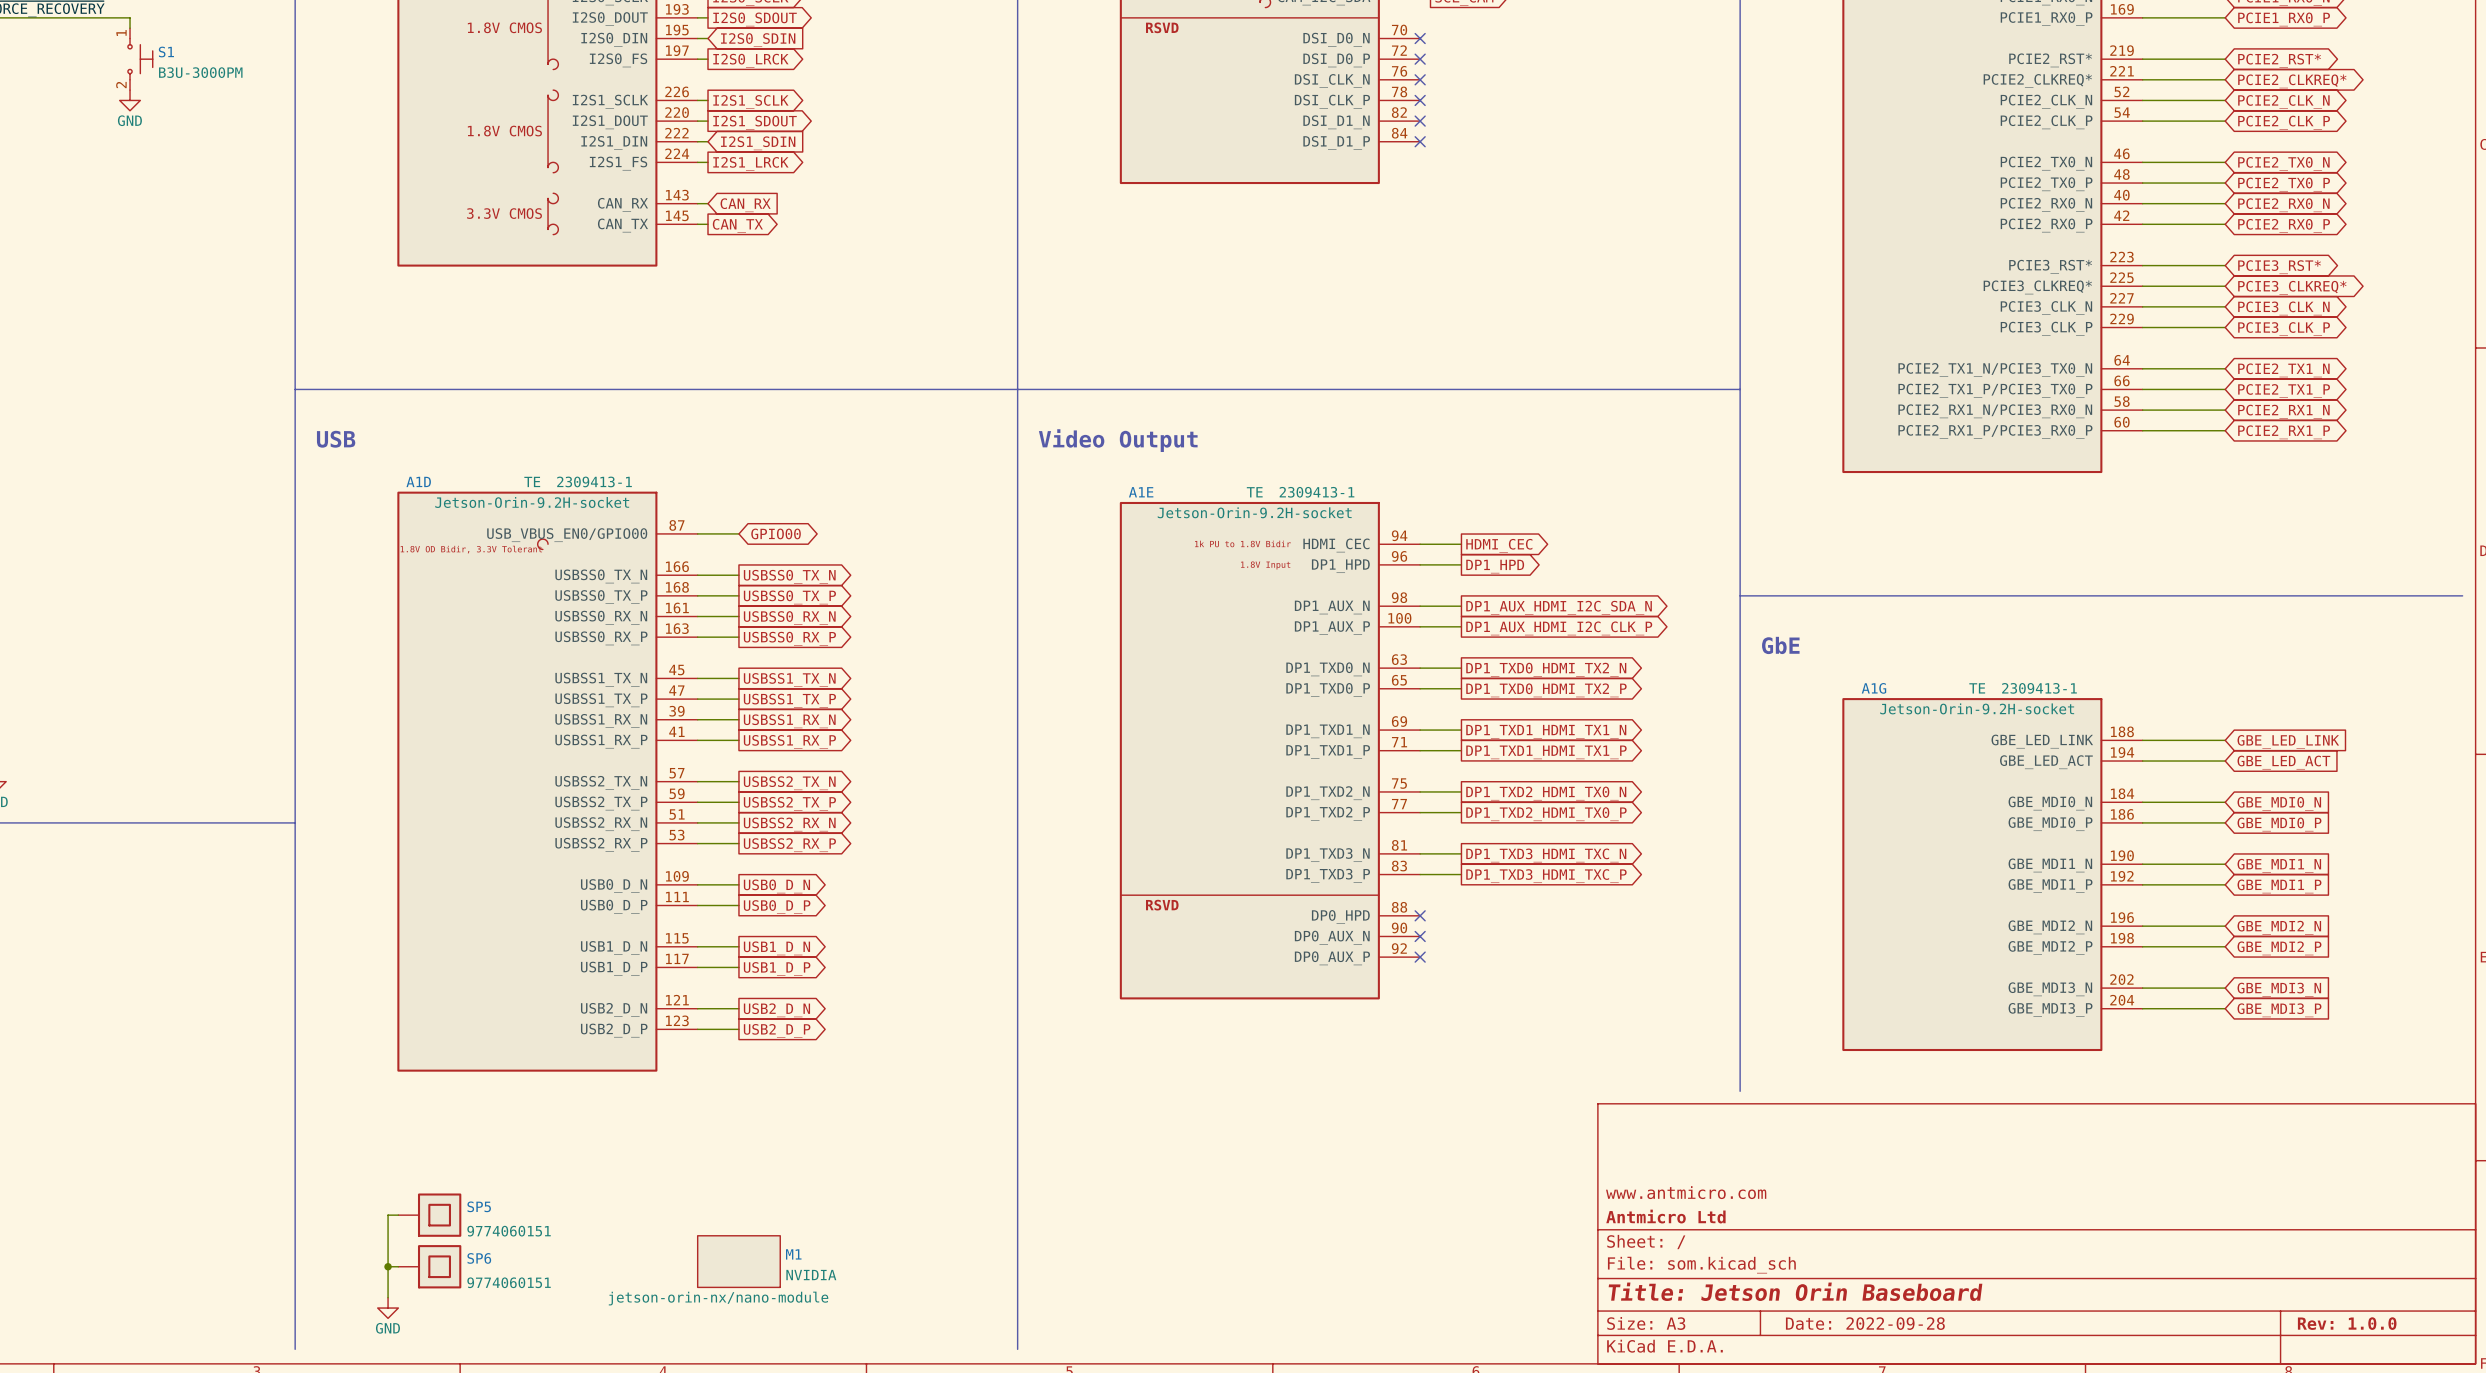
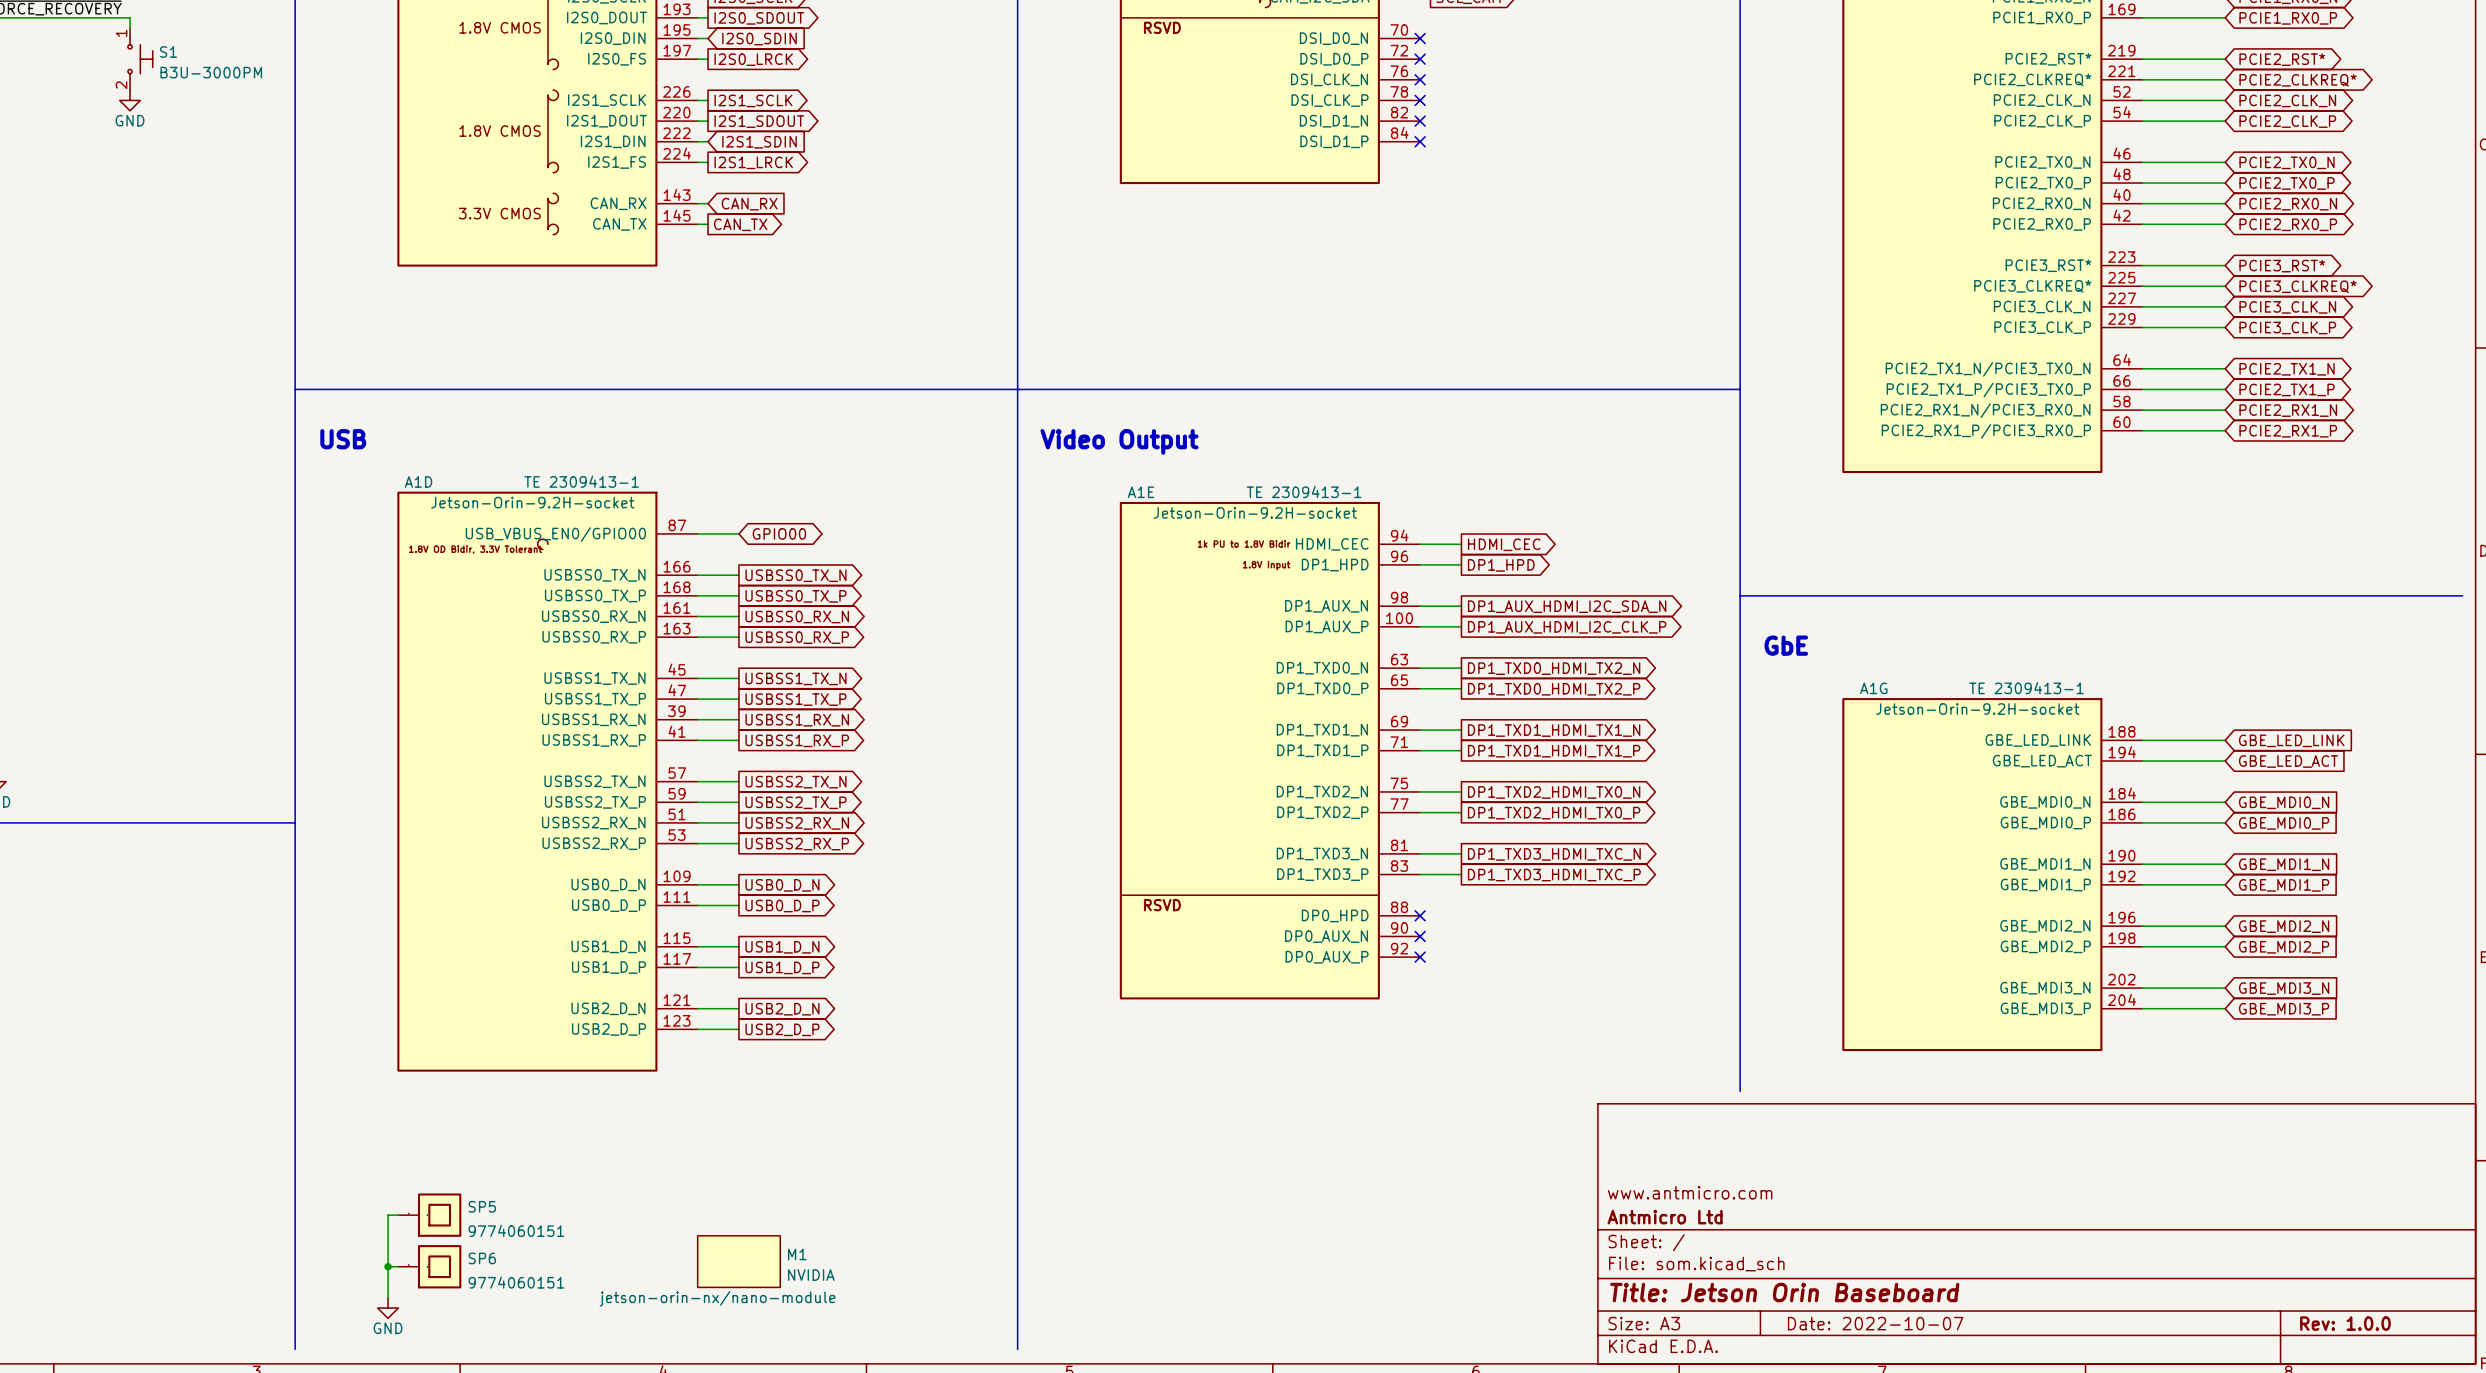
title block: Date: 2022-09-28 (1865, 1323) -> Date: 2022-10-07 (1875, 1323)

